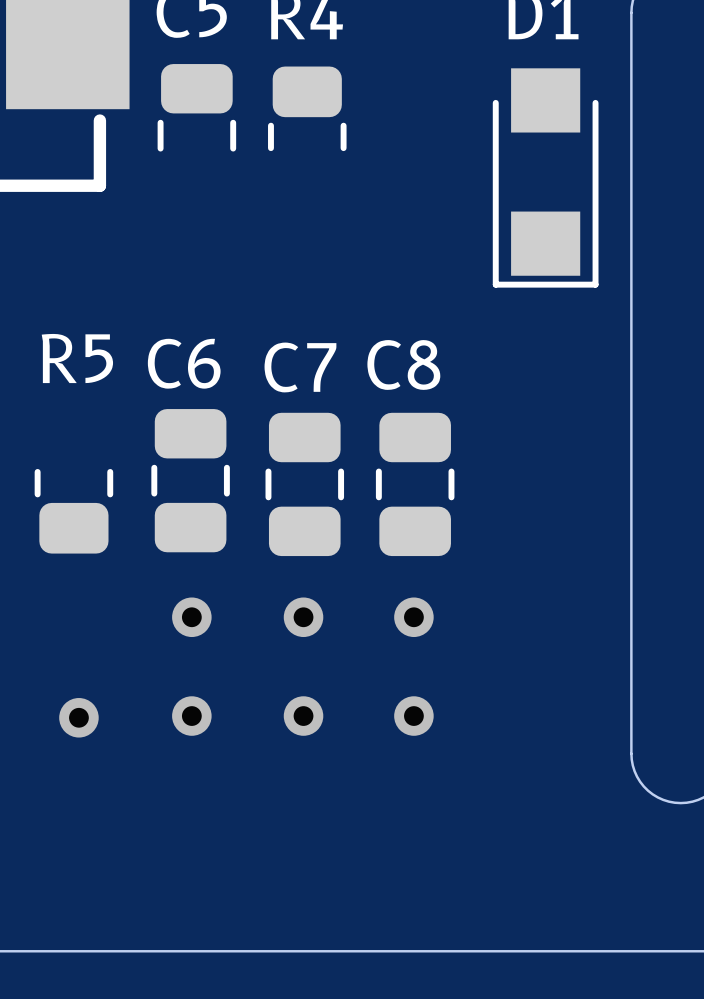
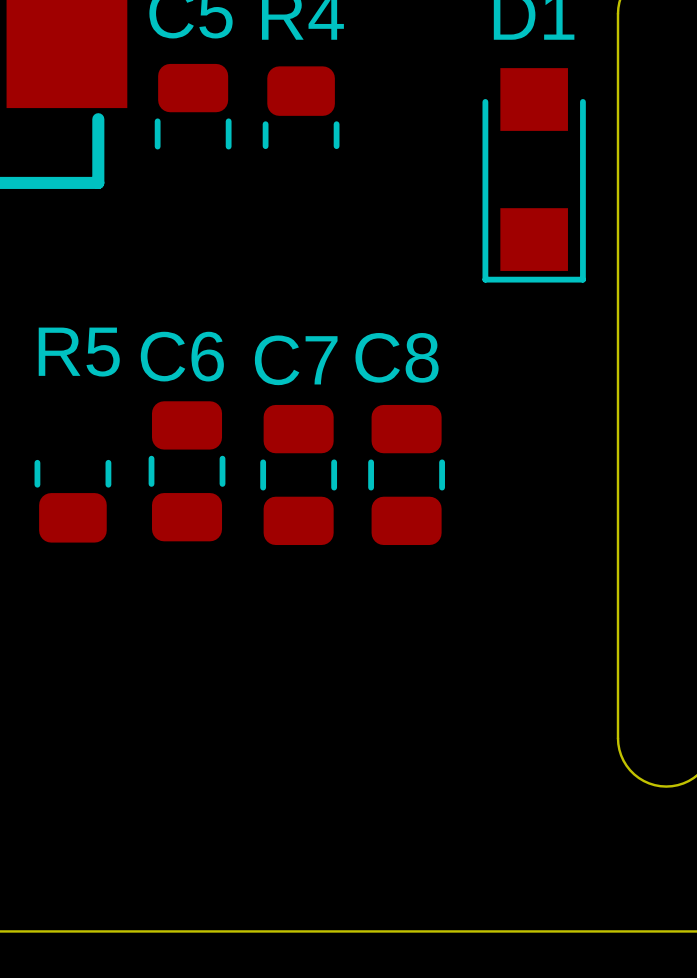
via: (191, 617) -> none
via: (303, 617) -> none
via: (413, 617) -> none
via: (191, 716) -> none
via: (303, 716) -> none
via: (413, 716) -> none
via: (78, 717) -> none

